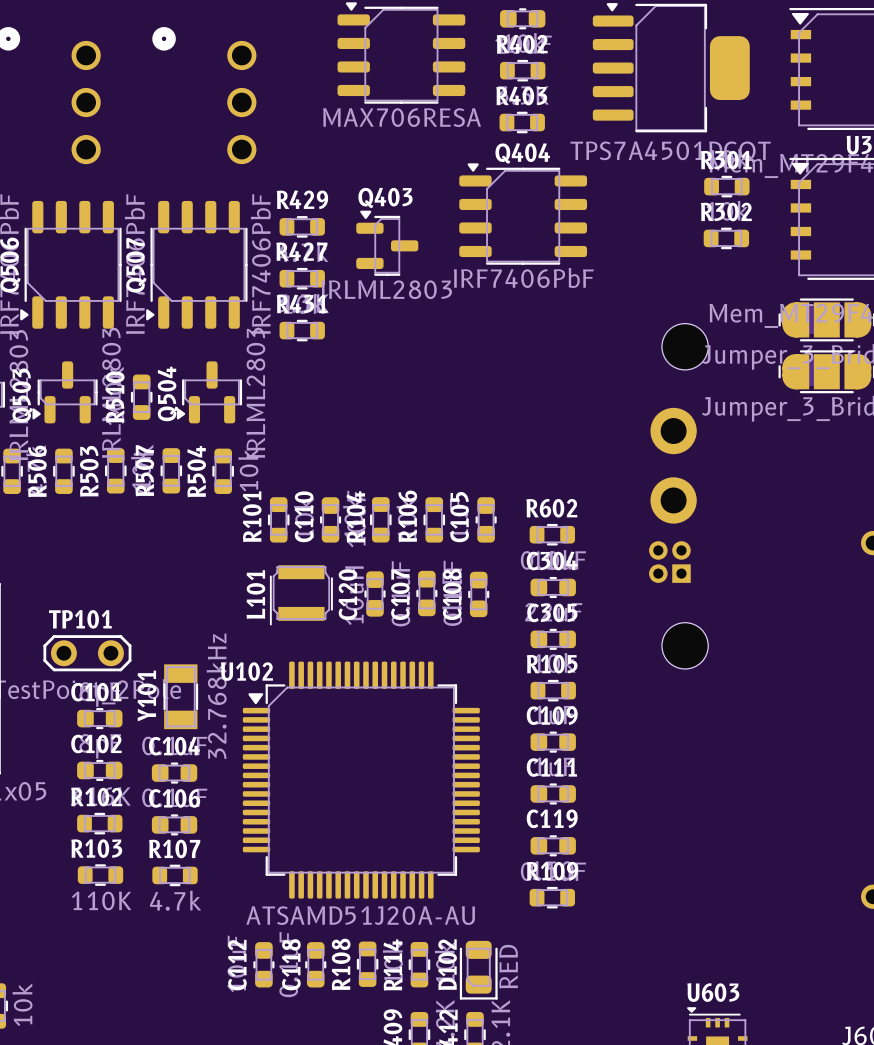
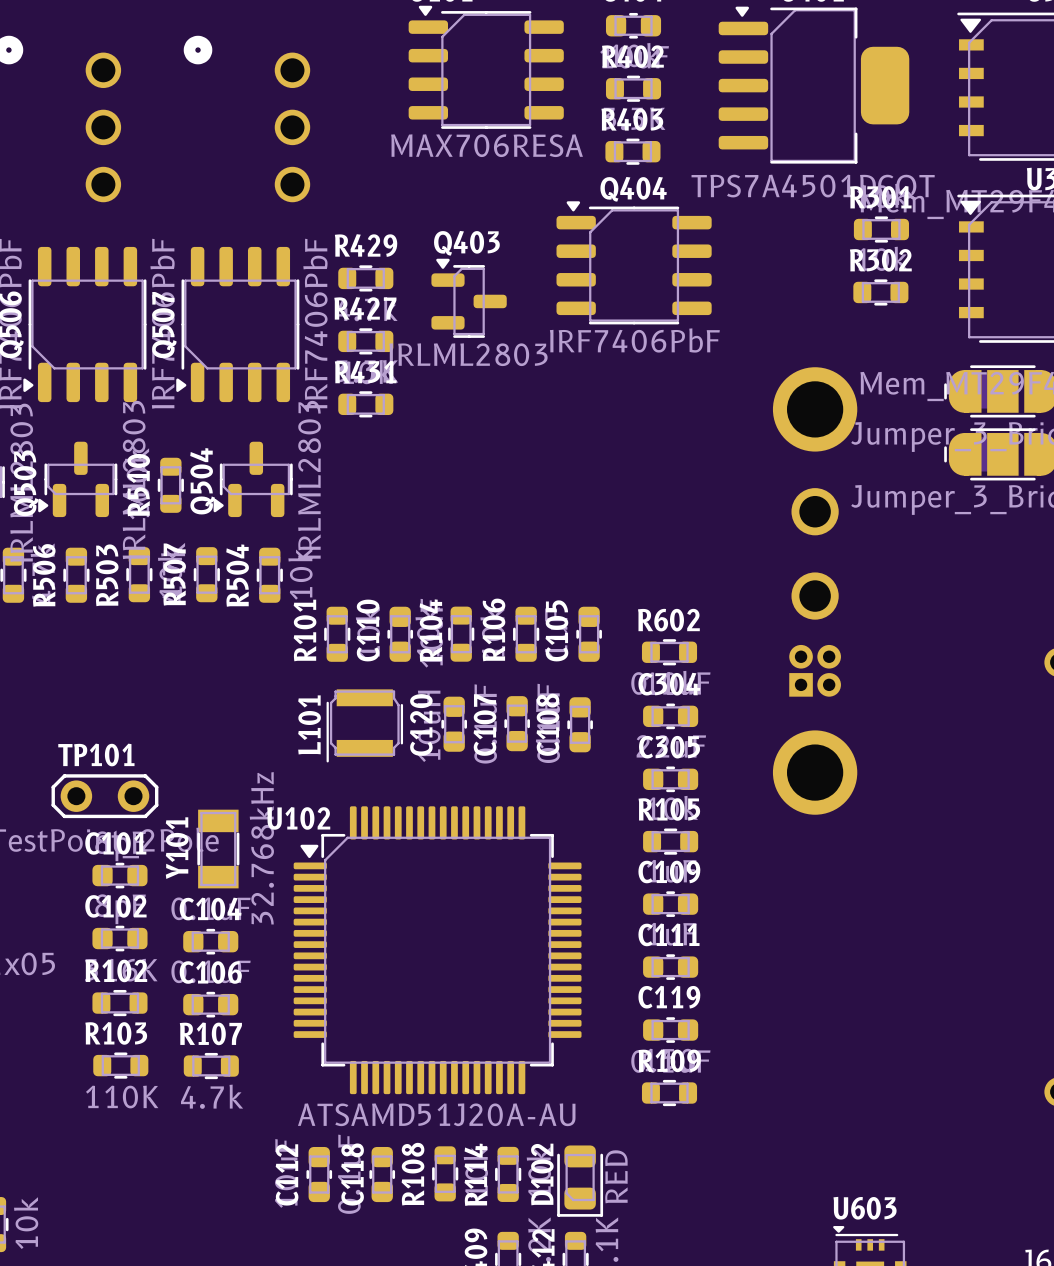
part footprint: [649, 323, 709, 669] -> [772, 367, 858, 815]

